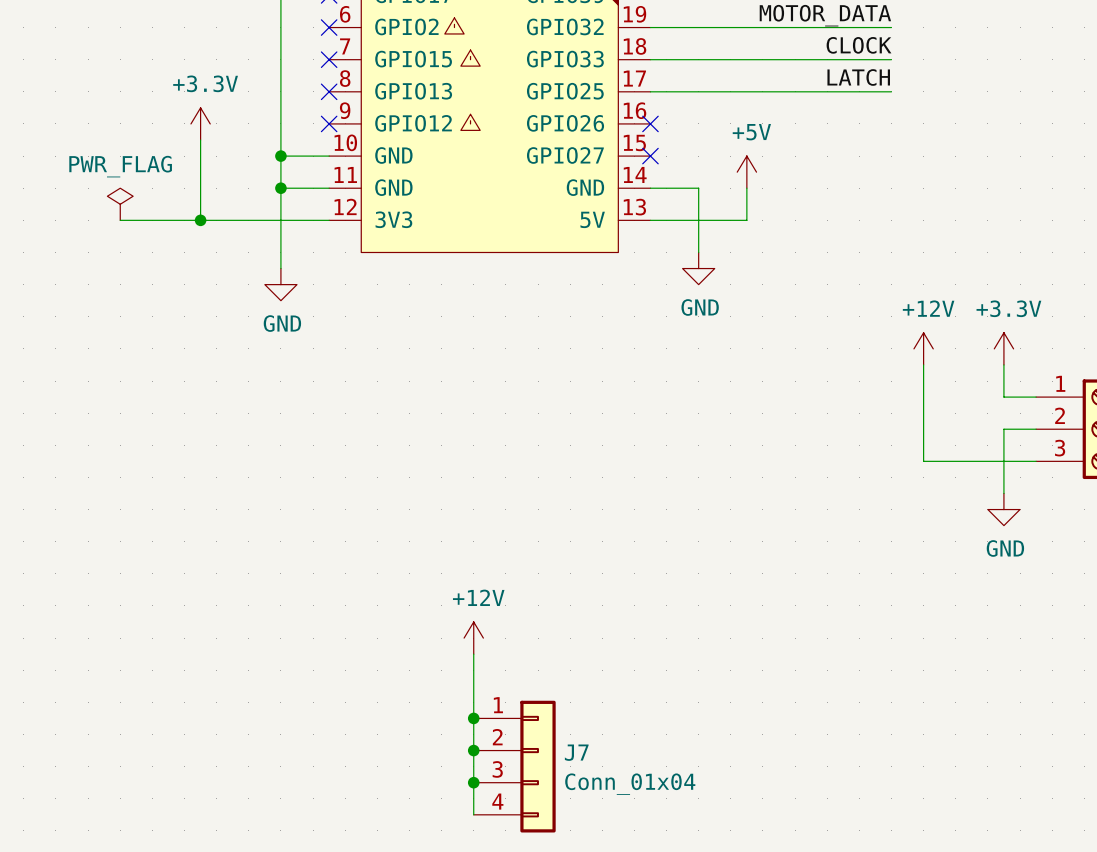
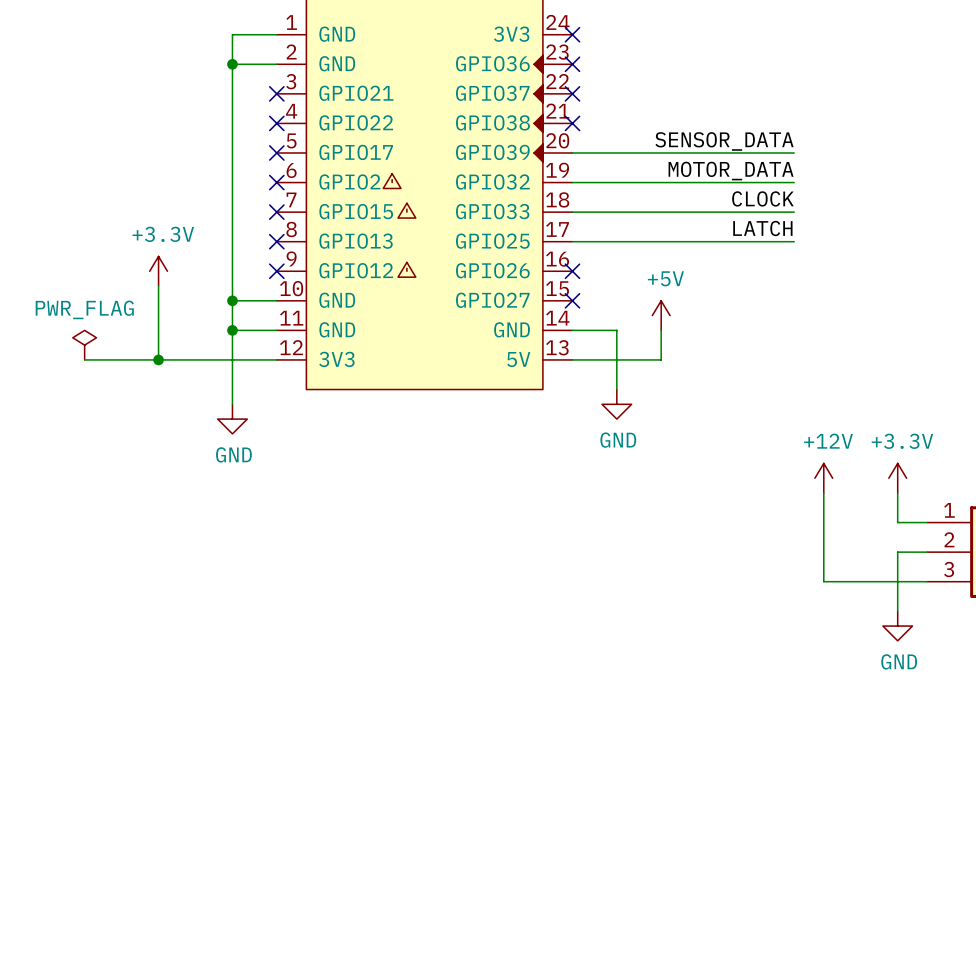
power symbol: +12V (473, 638) -> none
wire: (473, 654) (473, 814) -> none
junction: (473, 718) -> none
junction: (473, 750) -> none
J7: Conn_01x04 (514, 766) -> none
junction: (473, 782) -> none

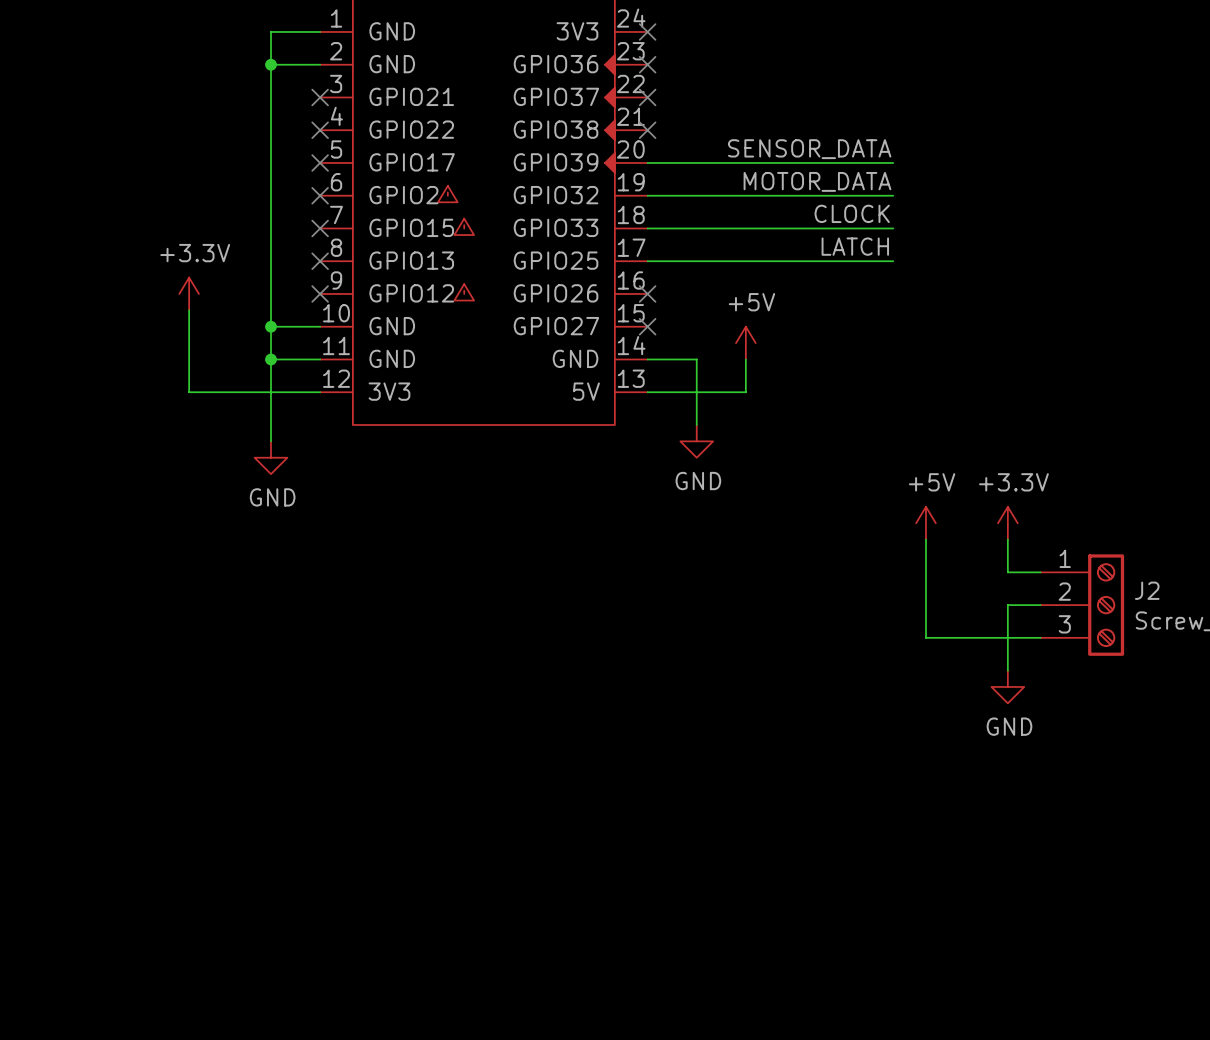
power symbol: PWR_FLAG (84, 345) -> none
wire: (84, 359) (158, 359) -> none
junction: (158, 359) -> none
power symbol: +12V (823, 478) -> +5V (925, 523)

